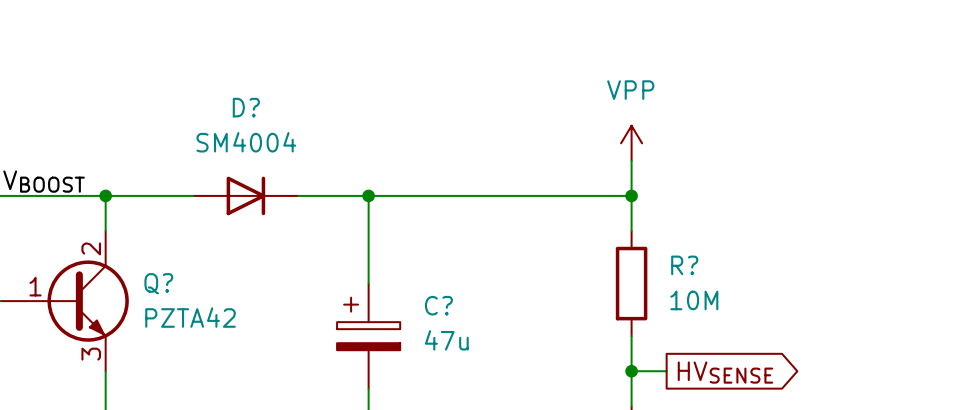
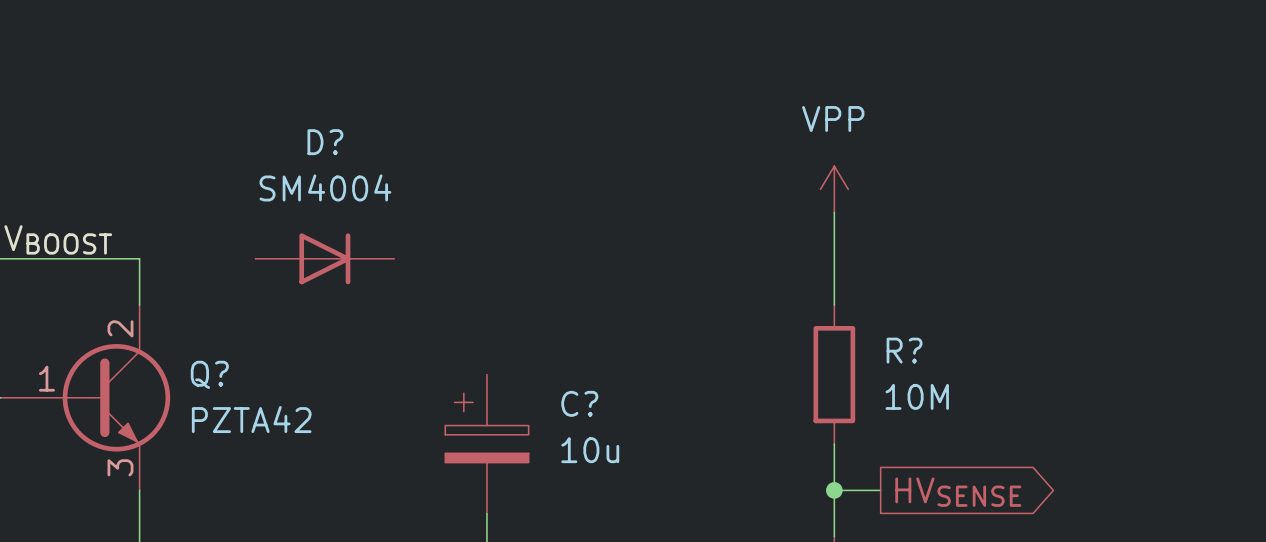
wire: (105, 195) (193, 195) -> none
junction: (105, 195) -> none
wire: (298, 195) (631, 195) -> none
wire: (368, 195) (368, 283) -> none
junction: (368, 195) -> none
junction: (631, 195) -> none
C? value: 47u (446, 340) -> 10u (590, 450)

